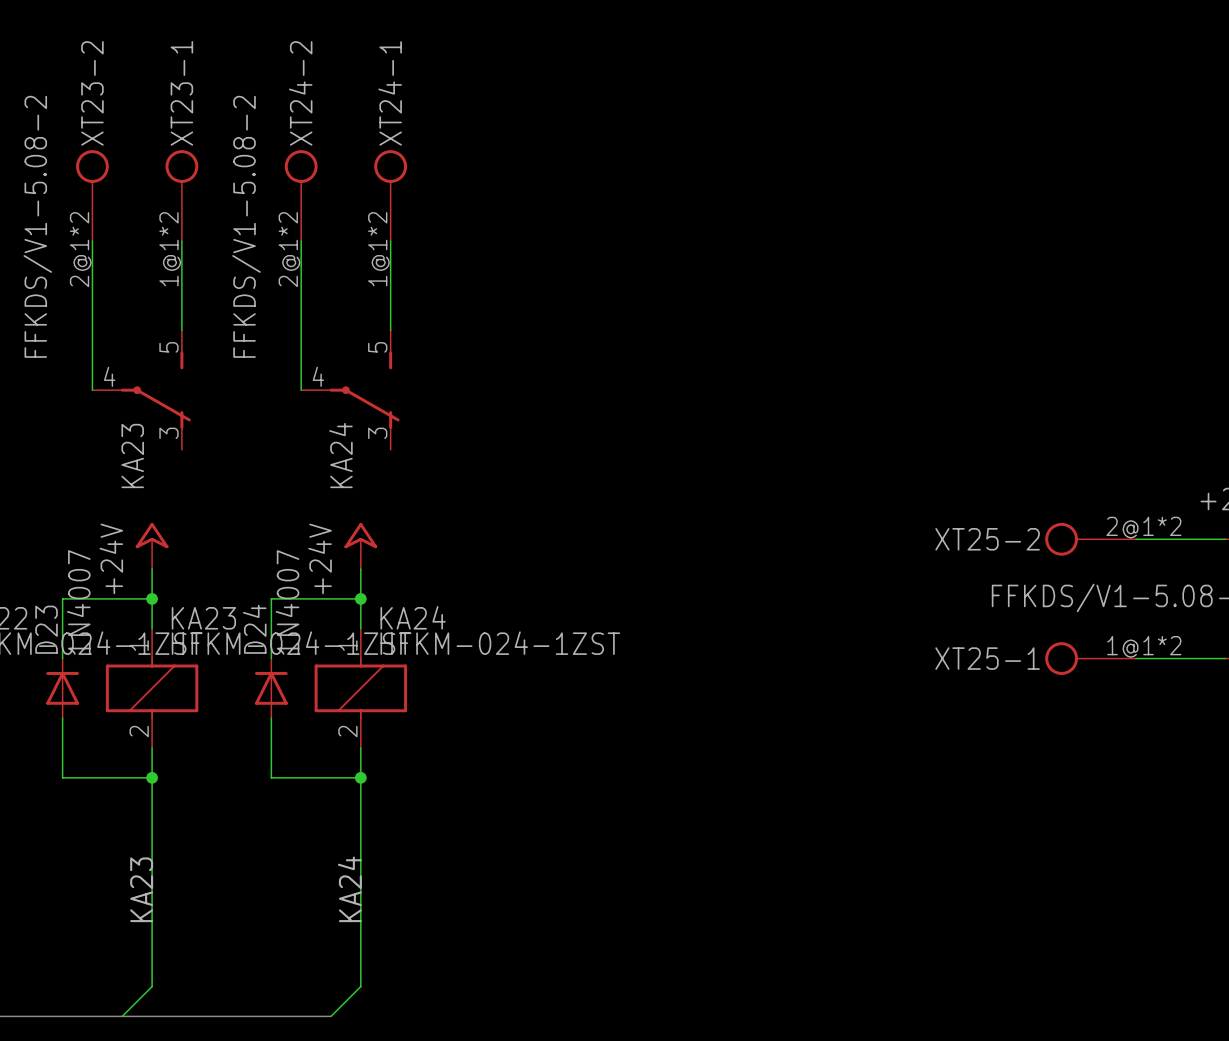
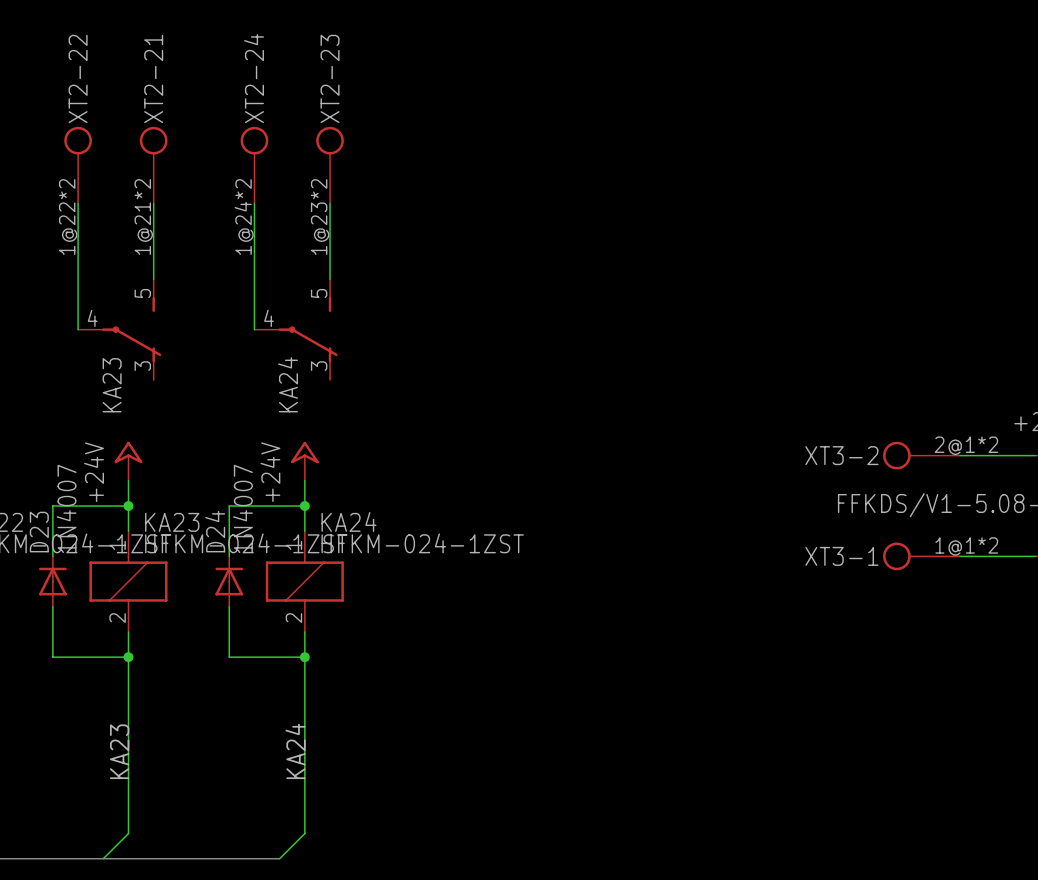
XT23-2 name: XT23-2 (92, 93) -> XT2-22 (78, 78)
XT23-1 name: XT23-1 (181, 93) -> XT2-21 (153, 78)
XT24-2 name: XT24-2 (300, 93) -> XT2-24 (254, 78)
XT24-1 name: XT24-1 (390, 93) -> XT2-23 (330, 78)
XT23-2 value: FFKDS/V1-5.08-2 (37, 226) -> none
XT24-2 value: FFKDS/V1-5.08-2 (246, 226) -> none
XT23-2 pin number: 2@1*2 (80, 249) -> 1@22*2 (68, 217)
XT23-1 pin number: 1@1*2 (170, 249) -> 1@21*2 (143, 217)
XT24-2 pin number: 2@1*2 (289, 249) -> 1@24*2 (244, 217)
XT24-1 pin number: 1@1*2 (379, 249) -> 1@23*2 (320, 217)
XT25-2 name: XT25-2 (987, 539) -> XT3-2 (841, 455)
XT25-1 name: XT25-1 (987, 658) -> XT3-1 (841, 556)

